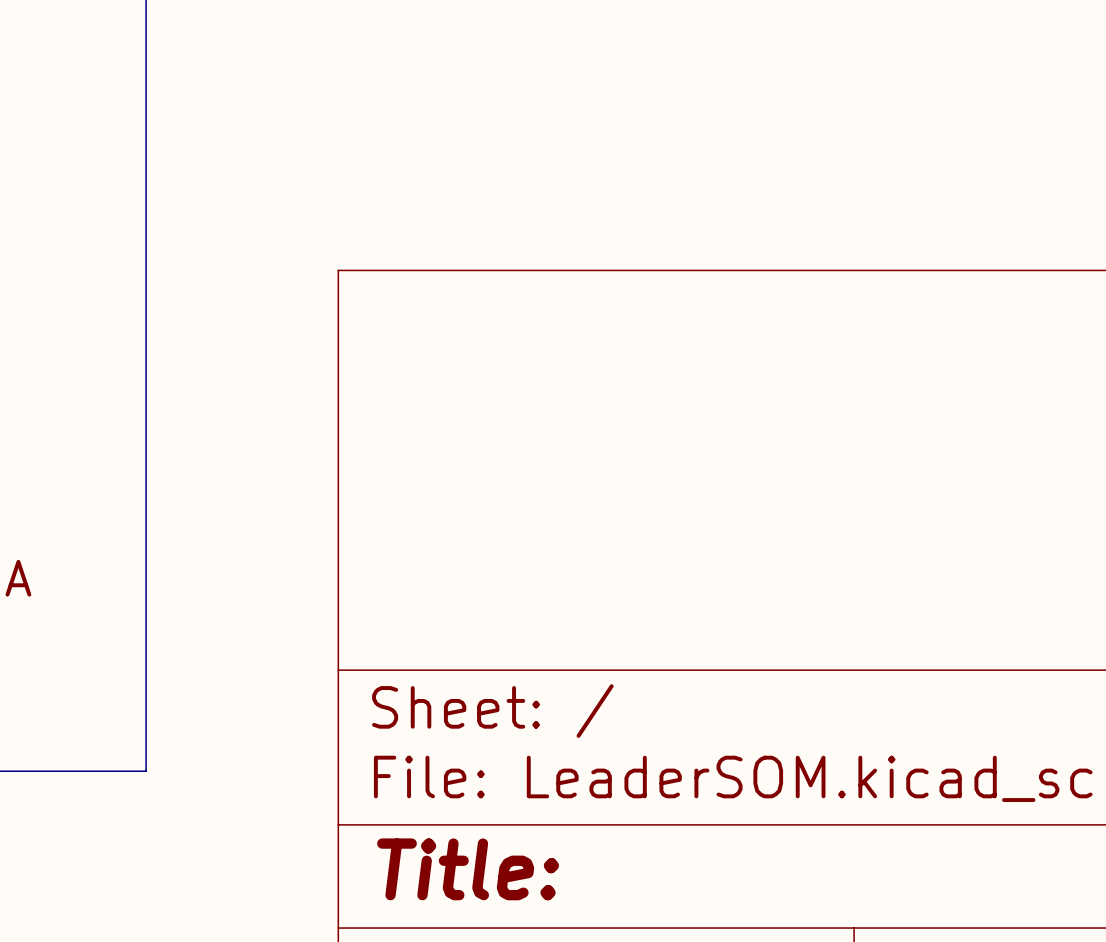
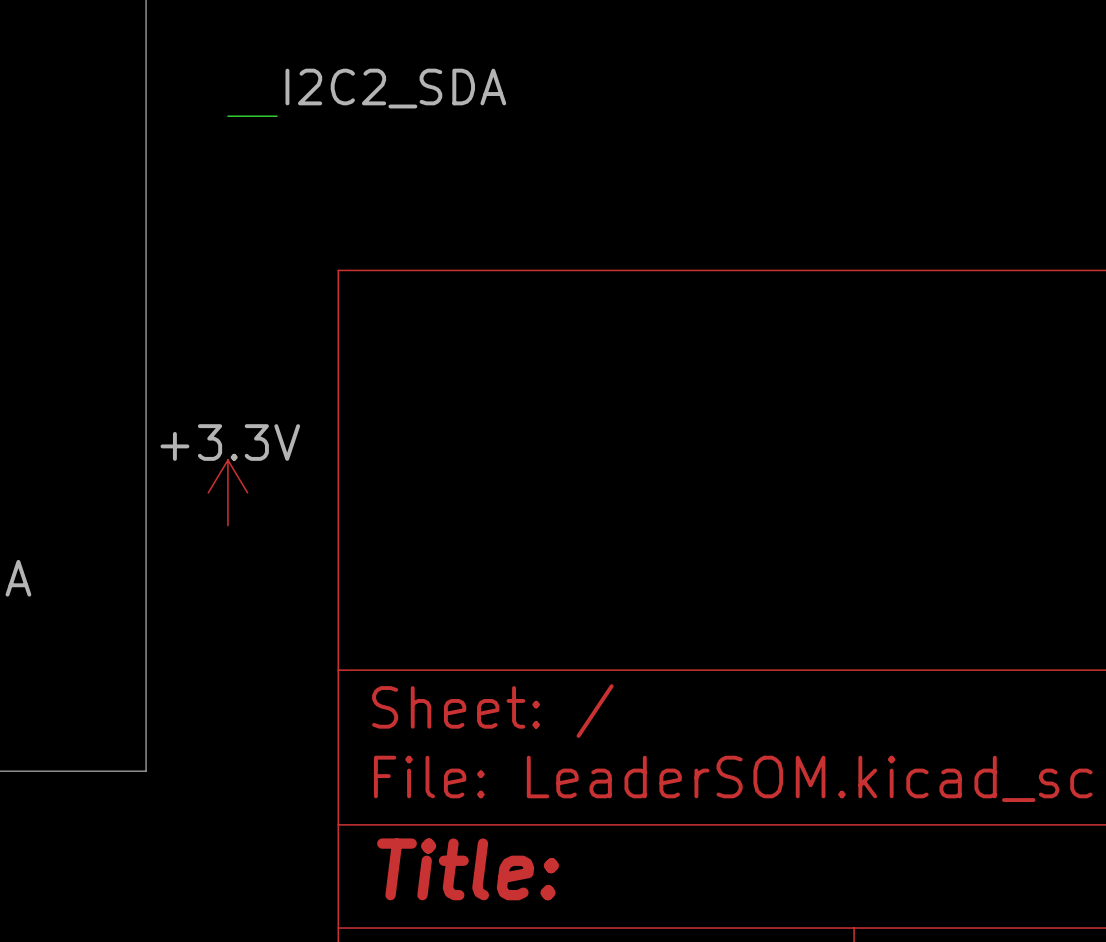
label: none -> I2C2_SDA (395, 88)
wire: none -> (227, 116) (277, 116)
power symbol: none -> +3.3V (227, 492)

